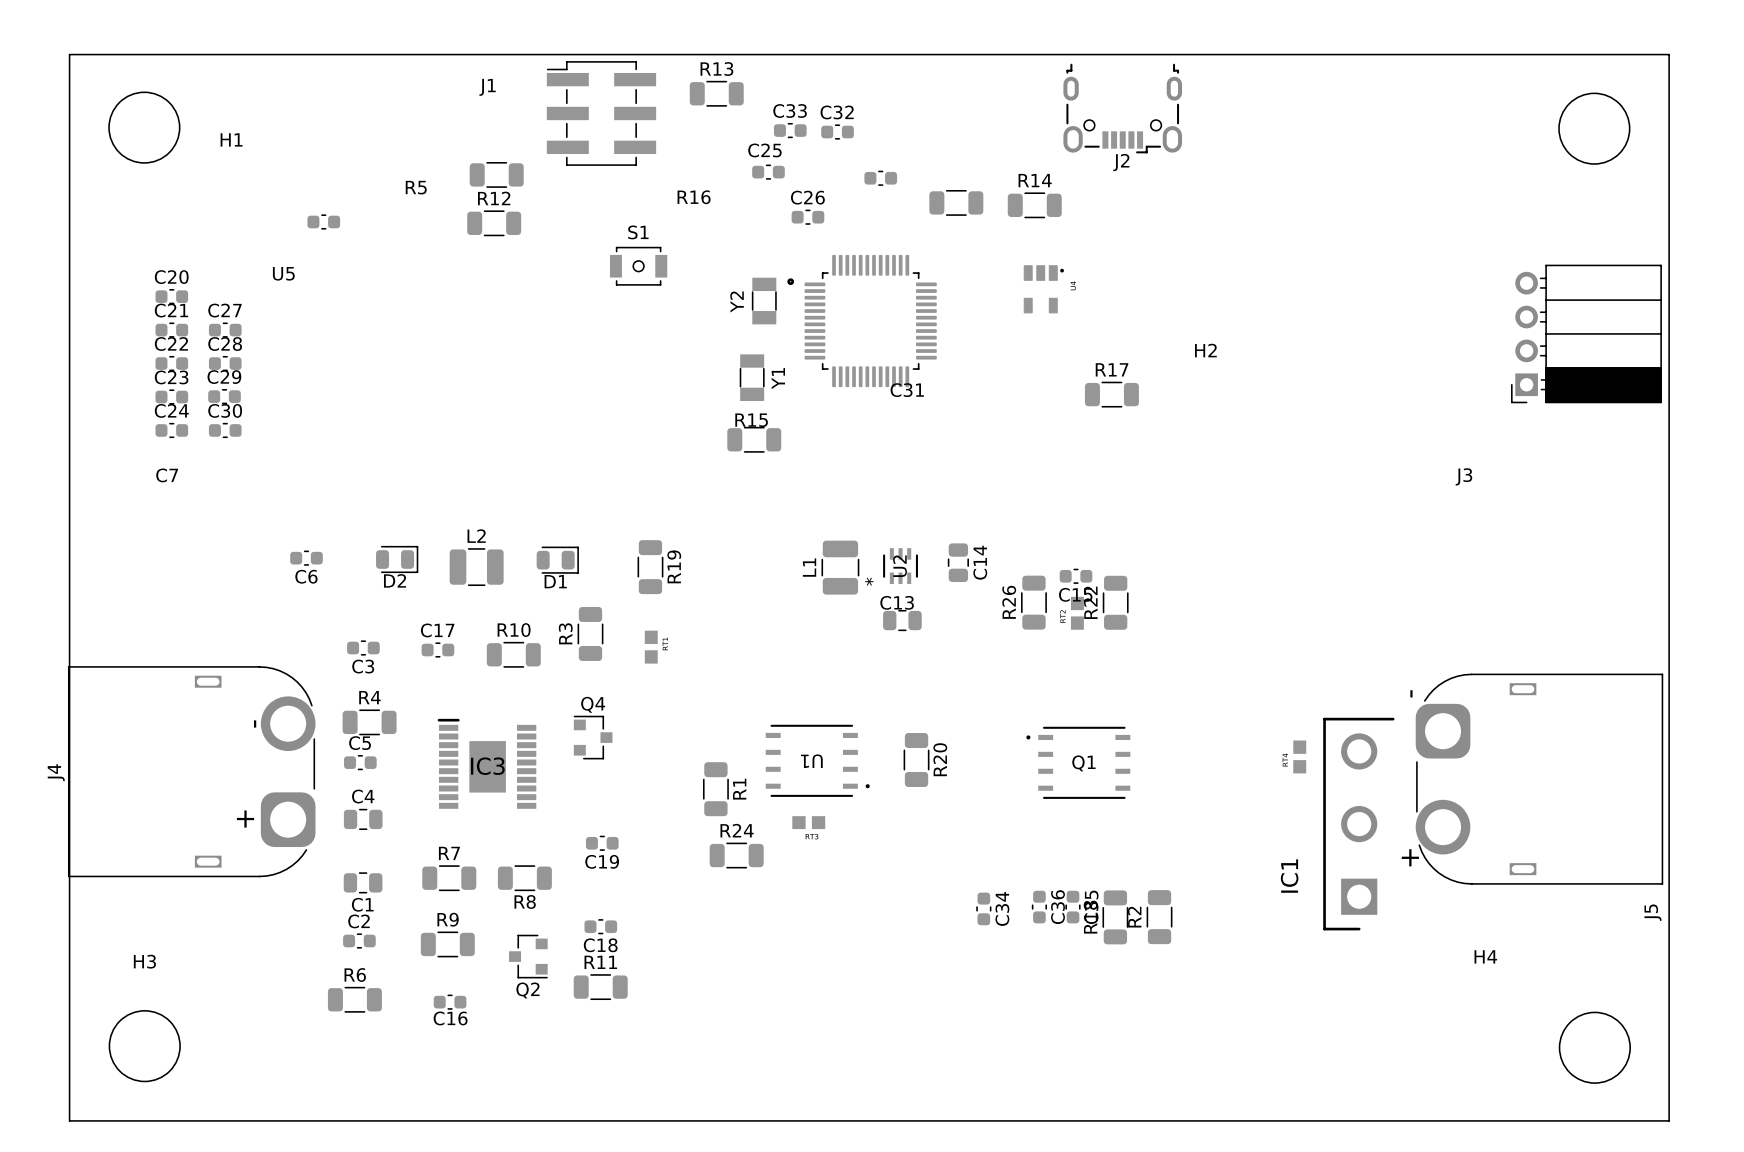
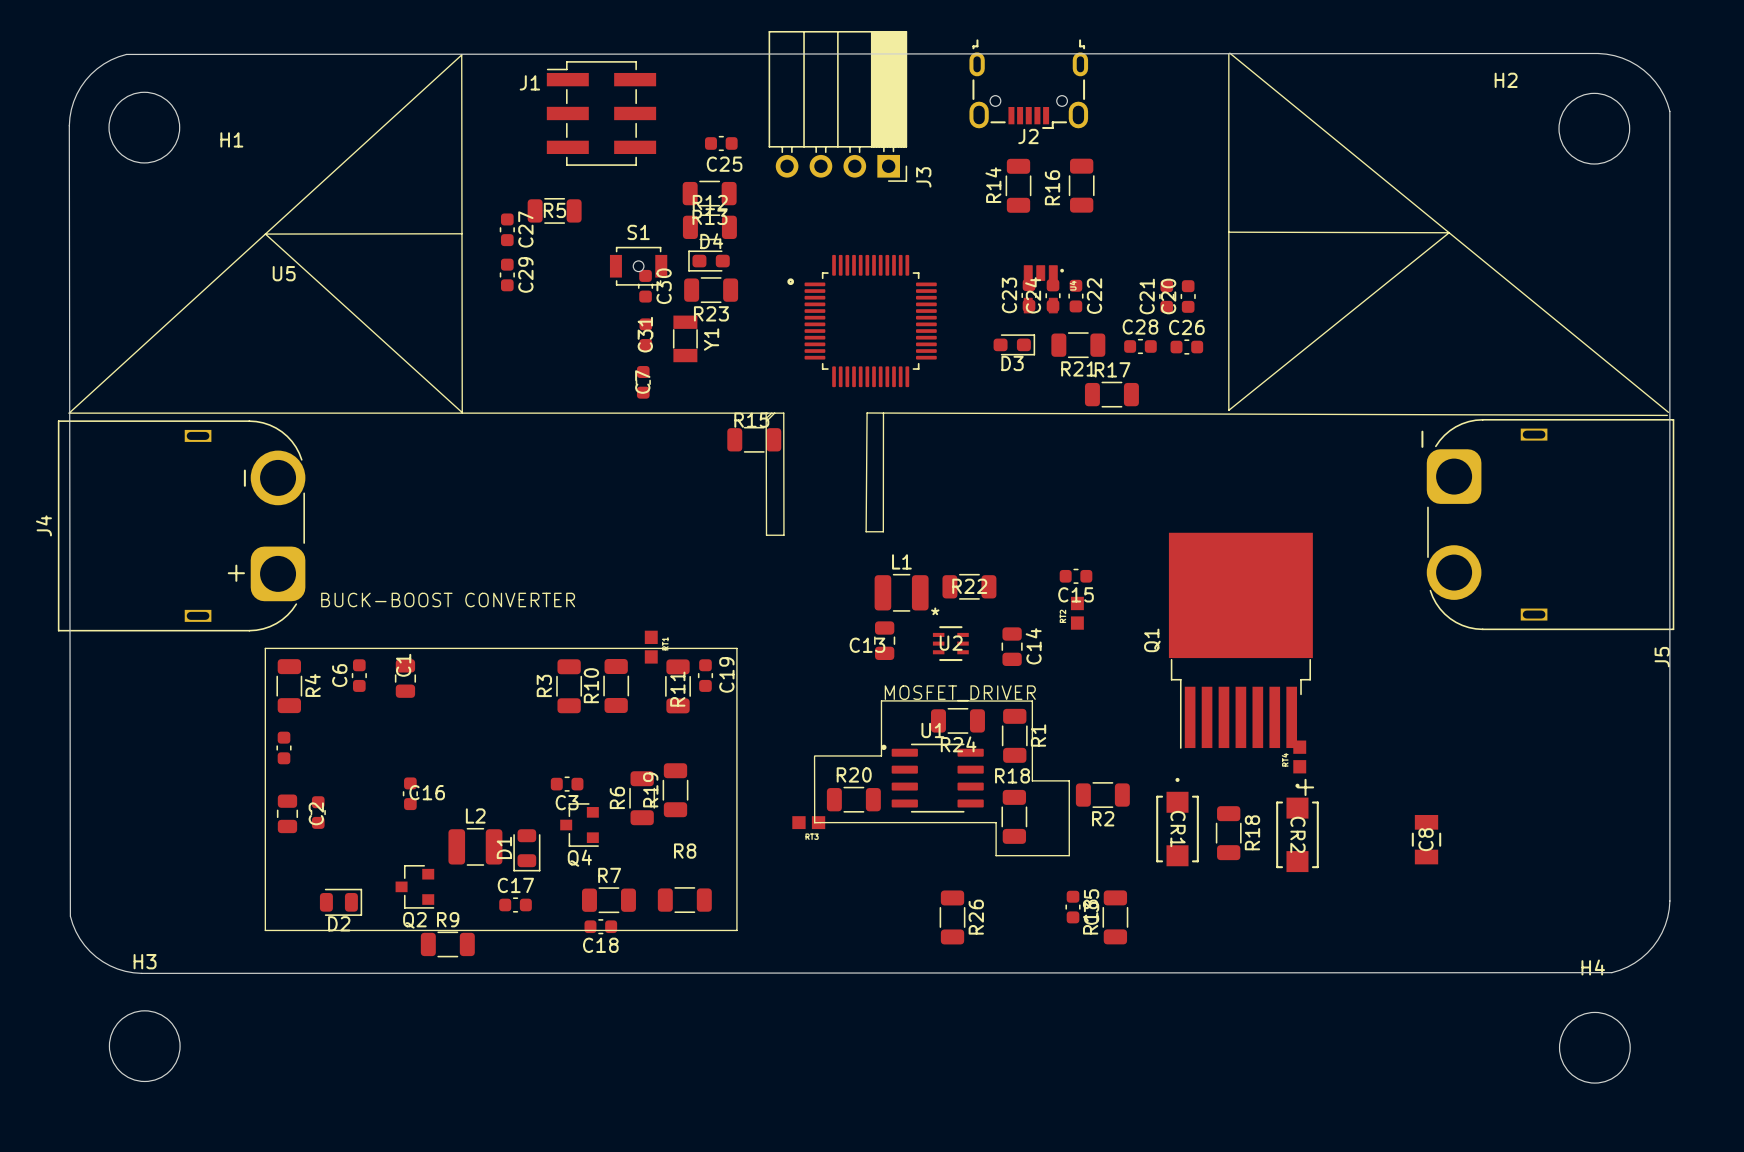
line: none -> (1229, 53) (1668, 412)
board edge: (69, 54) (1669, 54) (1669, 1120) (69, 1120) (69, 54) -> (1598, 53) (126, 54) (103, 63) (91, 74) (76, 94) (71, 109) (69, 125) (70, 916) (79, 938) (96, 957) (110, 965) (125, 971) (141, 973) (1611, 972) (1634, 963) (1647, 952) (1657, 939) (1665, 925) (1669, 900) (1669, 111) (1660, 88) (1643, 70) (1622, 58) (1598, 53)
line: none -> (1228, 54) (1228, 410) (1449, 232) (1228, 232)
R13 name position: R13 (716, 69) -> R13 (709, 217)
J1 name position: J1 (487, 87) -> J1 (529, 82)
R13 position: (716, 93) -> (709, 193)
J2 position: (1122, 108) -> (1028, 84)
C33: (790, 130) -> none
C32: (837, 132) -> none
C25 name position: C25 (764, 150) -> C25 (724, 164)
C25 position: (768, 172) -> (721, 143)
R5 position: (496, 174) -> (554, 210)
C31 rotation: 0° (880, 178) -> 90° clockwise (645, 334)
C31 position: (880, 178) -> (645, 334)
R14 name position: R14 (1035, 180) -> R14 (993, 185)
R5 name position: R5 (416, 187) -> R5 (554, 210)
R16 name position: R16 (694, 197) -> R16 (1052, 187)
R16 rotation: 0° (956, 202) -> 90° clockwise (1081, 185)
R16 position: (956, 202) -> (1081, 185)
R14 rotation: 0° (1034, 205) -> 90° clockwise (1018, 185)
C26 position: (807, 217) -> (1186, 347)
C7 rotation: 0° (323, 221) -> 90° clockwise (643, 382)
C7 position: (323, 221) -> (643, 382)
R12 position: (494, 223) -> (709, 227)
line: none -> (461, 233) (265, 234) (462, 412) (461, 54) (69, 413) (783, 413) (783, 535) (766, 535) (766, 413)
D4: none -> (708, 261)
C20 name position: C20 (171, 277) -> C20 (1168, 296)
R23: none -> (711, 290)
C20 rotation: 0° (171, 296) -> 90° clockwise (1188, 296)
C20 position: (171, 296) -> (1188, 296)
Y2: (764, 301) -> none
C21 name position: C21 (171, 310) -> C21 (1147, 296)
C21 rotation: 0° (171, 330) -> 90° clockwise (1166, 296)
C21 position: (171, 330) -> (1166, 296)
C27 rotation: 0° (225, 330) -> 90° clockwise (507, 229)
C27 position: (225, 330) -> (507, 229)
J3 rotation: 0° (1586, 333) -> 90° counterclockwise (837, 106)
J3 position: (1586, 333) -> (837, 106)
D3: none -> (1014, 344)
R21: none -> (1078, 345)
H2 name position: H2 (1205, 350) -> H2 (1506, 80)
C22 rotation: 0° (171, 363) -> 90° clockwise (1075, 296)
C22 position: (171, 363) -> (1075, 296)
C28 position: (225, 363) -> (1140, 346)
C23 name position: C23 (171, 377) -> C23 (1009, 295)
Y1 position: (752, 377) -> (685, 338)
C31 name position: C31 (907, 390) -> C31 (645, 334)
C29 rotation: 0° (224, 396) -> 90° clockwise (507, 274)
C29 position: (224, 396) -> (507, 274)
C23 rotation: 0° (171, 397) -> 90° clockwise (1029, 295)
C23 position: (171, 397) -> (1029, 295)
C24 name position: C24 (171, 410) -> C24 (1033, 295)
line: none -> (771, 413) (766, 418)
line: none -> (774, 413) (766, 421)
line: none -> (883, 413) (883, 531) (866, 531) (867, 413) (1667, 415)
C24 rotation: 0° (171, 430) -> 90° clockwise (1053, 295)
C24 position: (171, 430) -> (1053, 295)
C30 rotation: 0° (225, 430) -> 90° clockwise (645, 286)
C30 position: (225, 430) -> (645, 286)
C7 name position: C7 (167, 475) -> C7 (642, 382)
J3 name position: J3 (1463, 476) -> J3 (923, 177)
C6 rotation: 0° (306, 558) -> 90° clockwise (359, 675)
C6 position: (306, 558) -> (359, 675)
D2 position: (397, 559) -> (341, 902)
D1 rotation: 0° (557, 560) -> 90° clockwise (526, 850)
D1 position: (557, 560) -> (526, 850)
C14 position: (958, 562) -> (1012, 646)
R19 name position: R19 (674, 566) -> R19 (650, 789)
U2 rotation: 0° (900, 566) -> 90° clockwise (950, 643)
U2 position: (900, 566) -> (950, 643)
L2 position: (476, 567) -> (475, 846)
R19 position: (650, 567) -> (675, 790)
L1 rotation: 0° (840, 567) -> 90° clockwise (901, 592)
L1 position: (840, 567) -> (901, 592)
text: none -> BUCK-BOOST CONVERTER (448, 599)
R26 name position: R26 (1009, 602) -> R26 (976, 917)
R26 position: (1033, 602) -> (952, 917)
R22 rotation: 0° (1115, 602) -> 90° clockwise (969, 586)
R22 position: (1115, 602) -> (969, 586)
C13 rotation: 0° (902, 620) -> 90° clockwise (884, 640)
C13 position: (902, 620) -> (884, 640)
R10 name position: R10 (514, 630) -> R10 (591, 685)
R3 position: (590, 633) -> (569, 686)
line: none -> (265, 648) (736, 648) (736, 930) (265, 930) (265, 648)
C3 position: (363, 648) -> (567, 784)
C17 position: (437, 650) -> (515, 904)
R10 rotation: 0° (513, 654) -> 90° clockwise (616, 685)
R10 position: (513, 654) -> (616, 685)
text: none -> MOSFET_DRIVER (960, 693)
R4 rotation: 0° (369, 722) -> 90° clockwise (289, 686)
R4 position: (369, 722) -> (289, 686)
U1 footprint: [765, 724, 870, 797] -> [881, 743, 984, 813]
Q1 footprint: [1026, 726, 1131, 799] -> [1168, 532, 1313, 749]
Q4 rotation: 0° (593, 737) -> 180° (579, 825)
Q4 position: (593, 737) -> (579, 825)
part: none -> (284, 747)
line: none -> (814, 755) (881, 755) (881, 700) (1032, 701) (1032, 780) (1069, 780) (1069, 855) (996, 855) (996, 822) (814, 822) (814, 756)
R20 name position: R20 (940, 759) -> R20 (854, 774)
R20 rotation: 0° (916, 760) -> 90° clockwise (853, 799)
R20 position: (916, 760) -> (853, 799)
U1 name position: U1 (811, 761) -> U1 (932, 730)
C5: (360, 762) -> none
IC3: (486, 763) -> none
Q1 name position: Q1 (1083, 763) -> Q1 (1152, 640)
J4 position: (191, 771) -> (181, 525)
J5 position: (1539, 779) -> (1550, 524)
R1 position: (715, 789) -> (1014, 735)
part: none -> (287, 813)
R18: none -> (1014, 816)
C4: (363, 819) -> none
CR1: none -> (1177, 822)
IC1: (1358, 824) -> none
CR2: none -> (1297, 827)
R24 name position: R24 (737, 830) -> R24 (958, 744)
R18: none -> (1228, 833)
C8: none -> (1426, 839)
C19 rotation: 0° (602, 843) -> 90° clockwise (705, 675)
C19 position: (602, 843) -> (705, 675)
R24 position: (736, 855) -> (957, 720)
J5 text position: + (1410, 857) -> + (1305, 787)
C19 name position: C19 (602, 861) -> C19 (726, 674)
R7 position: (449, 878) -> (608, 900)
R8 position: (524, 878) -> (684, 900)
C1 rotation: 0° (363, 882) -> 90° clockwise (405, 678)
C1 position: (363, 882) -> (405, 678)
R8 name position: R8 (525, 901) -> R8 (685, 851)
C36: (1039, 907) -> none
C34: (983, 908) -> none
R2 name position: R2 (1134, 917) -> R2 (1103, 818)
R2 rotation: 0° (1159, 917) -> 90° clockwise (1102, 795)
R2 position: (1159, 917) -> (1102, 795)
C2 rotation: 0° (359, 940) -> 90° clockwise (318, 812)
C2 position: (359, 940) -> (318, 812)
Q2 position: (528, 956) -> (414, 886)
H4 name position: H4 (1485, 956) -> H4 (1593, 967)
R6 name position: R6 (355, 975) -> R6 (617, 797)
R11 rotation: 0° (600, 987) -> 90° clockwise (678, 686)
R11 position: (600, 987) -> (678, 686)
R6 rotation: 0° (354, 999) -> 90° clockwise (642, 798)
R6 position: (354, 999) -> (642, 798)
C16 rotation: 0° (450, 1002) -> 90° clockwise (410, 793)
C16 position: (450, 1002) -> (410, 793)

